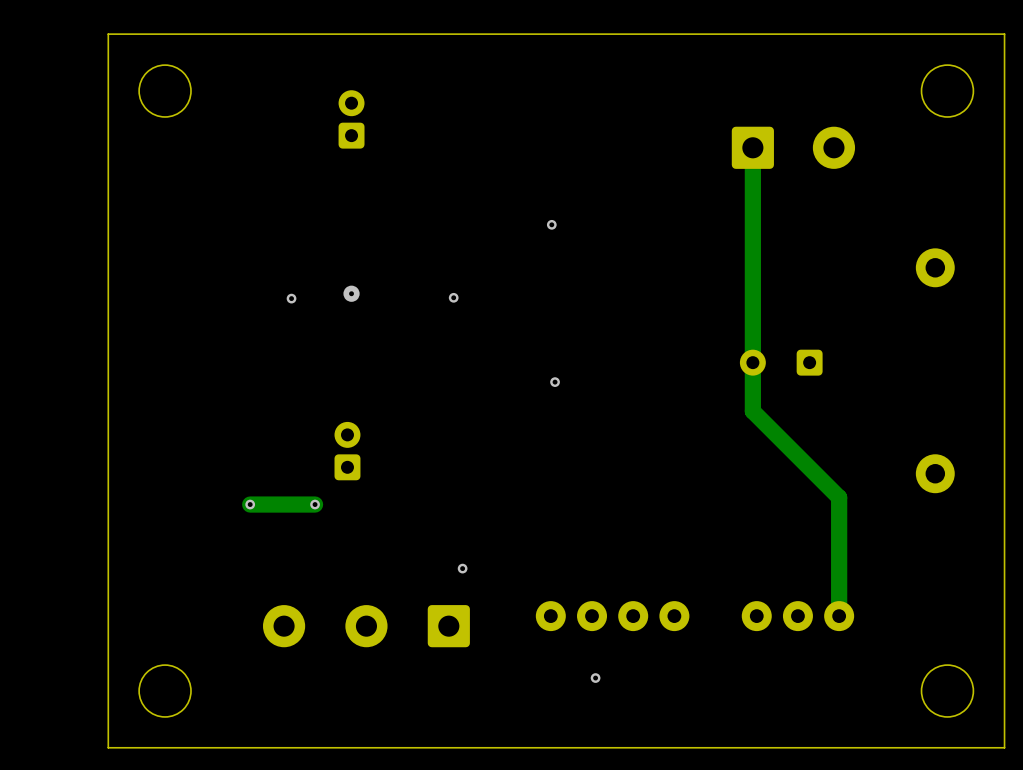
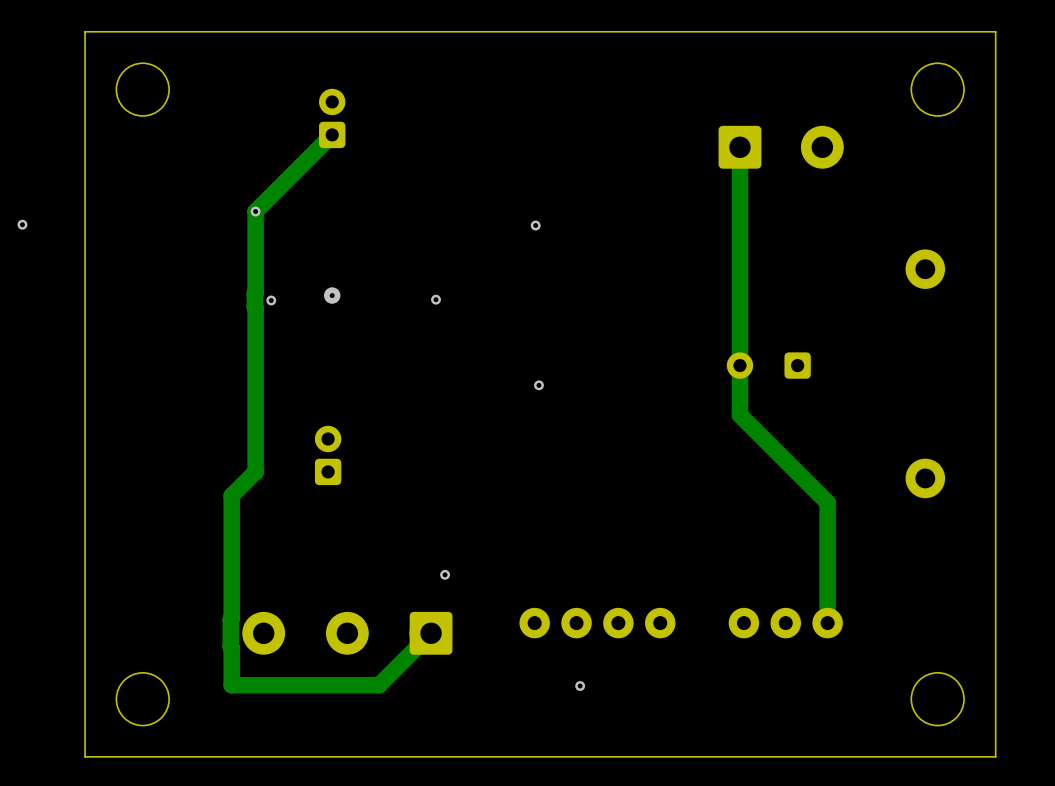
track: none -> (332, 134) (255, 211) (255, 471) (231, 495) (231, 685) (379, 685) (431, 633) (417, 633)
via: none -> (255, 211)
via: none -> (22, 224)
via: (250, 504) -> none
track: (315, 504) (250, 504) -> none
via: (315, 504) -> none

